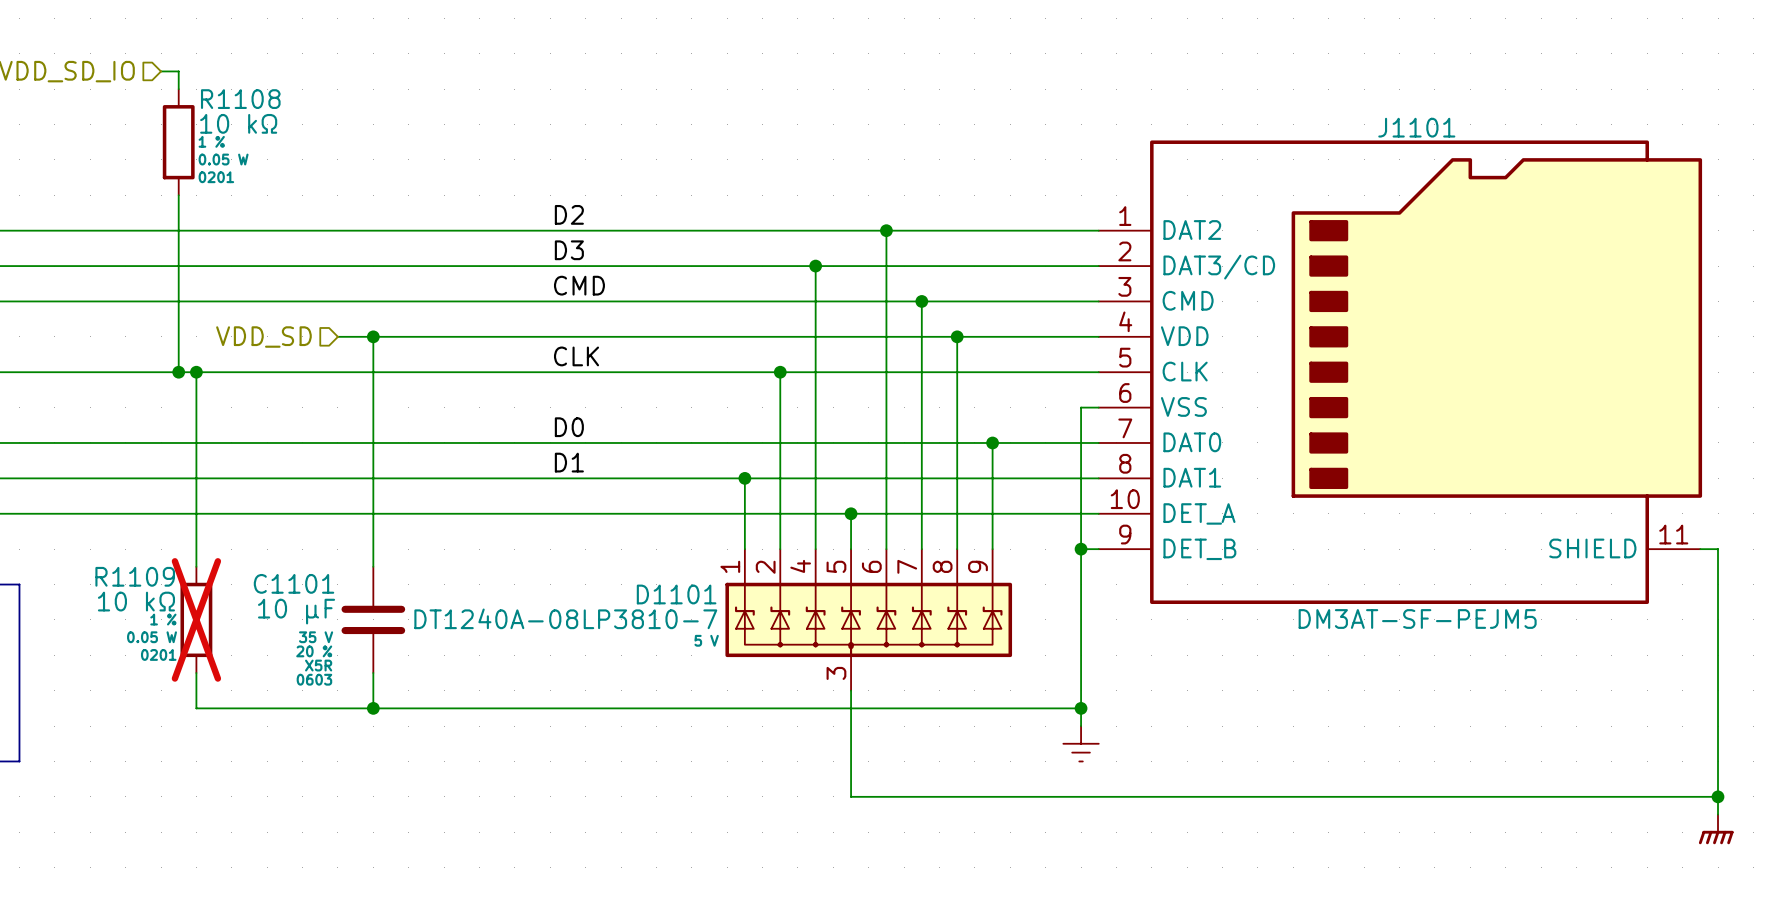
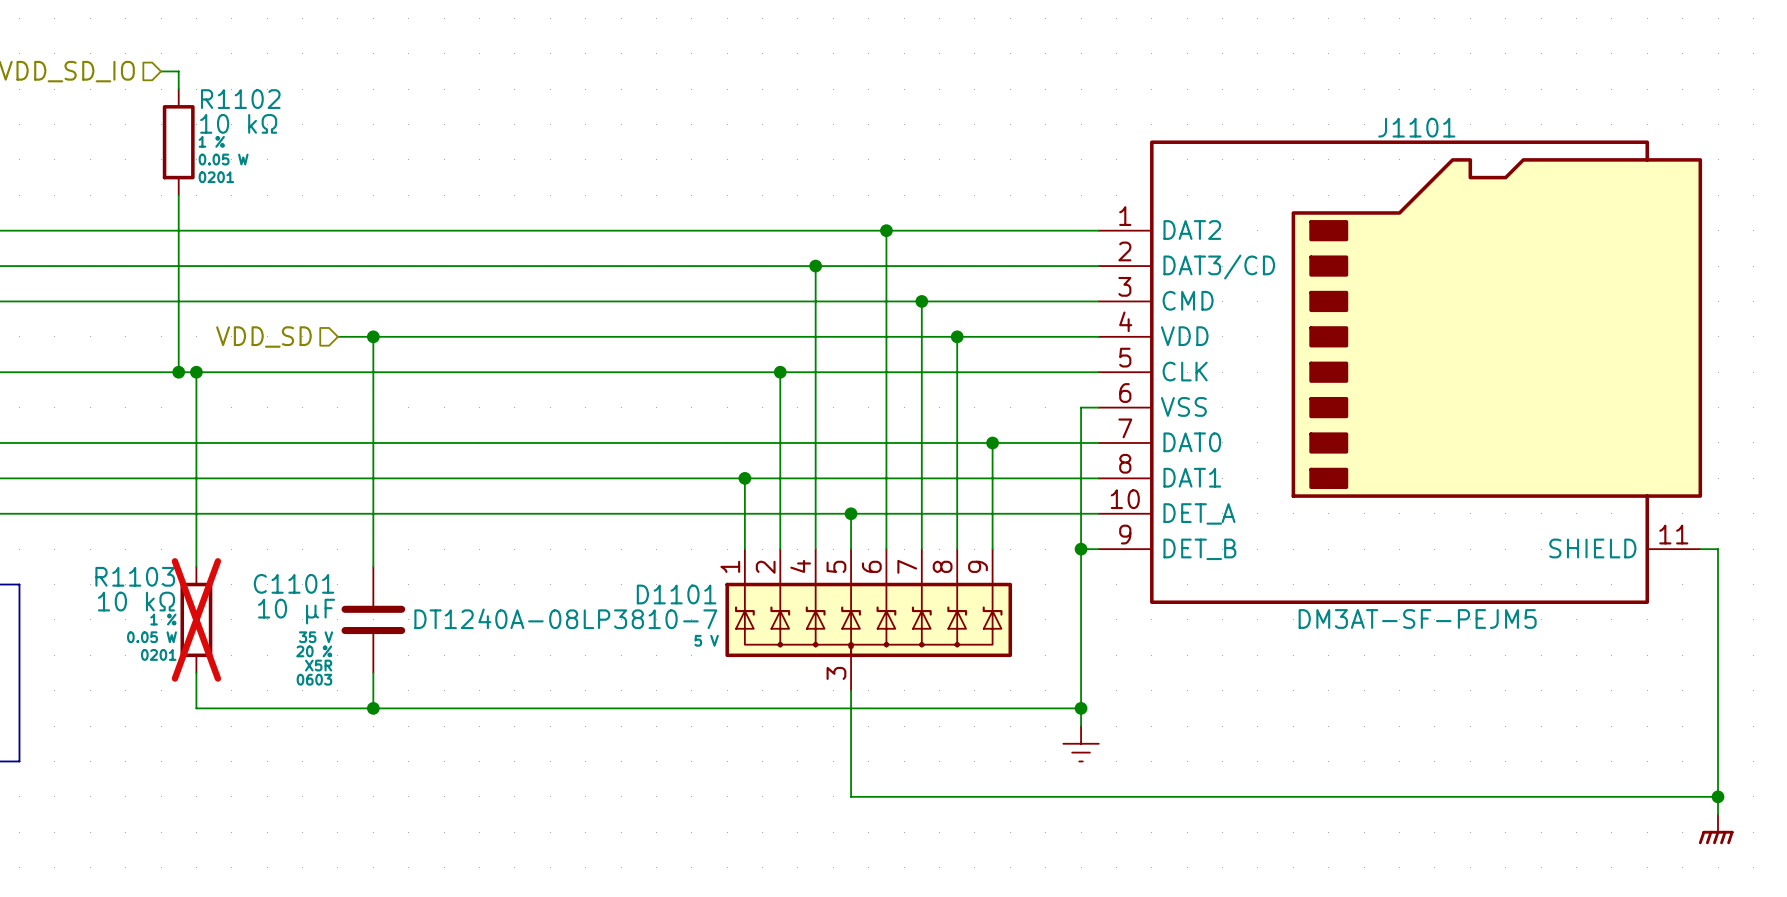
R1108 name: R1108 (240, 99) -> R1102 (240, 99)
label: D2 (569, 214) -> none
label: D3 (569, 250) -> none
label: CMD (579, 285) -> none
label: CLK (576, 356) -> none
label: D0 (569, 427) -> none
label: D1 (569, 462) -> none
R1109 name: R1109 (135, 576) -> R1103 (135, 576)

